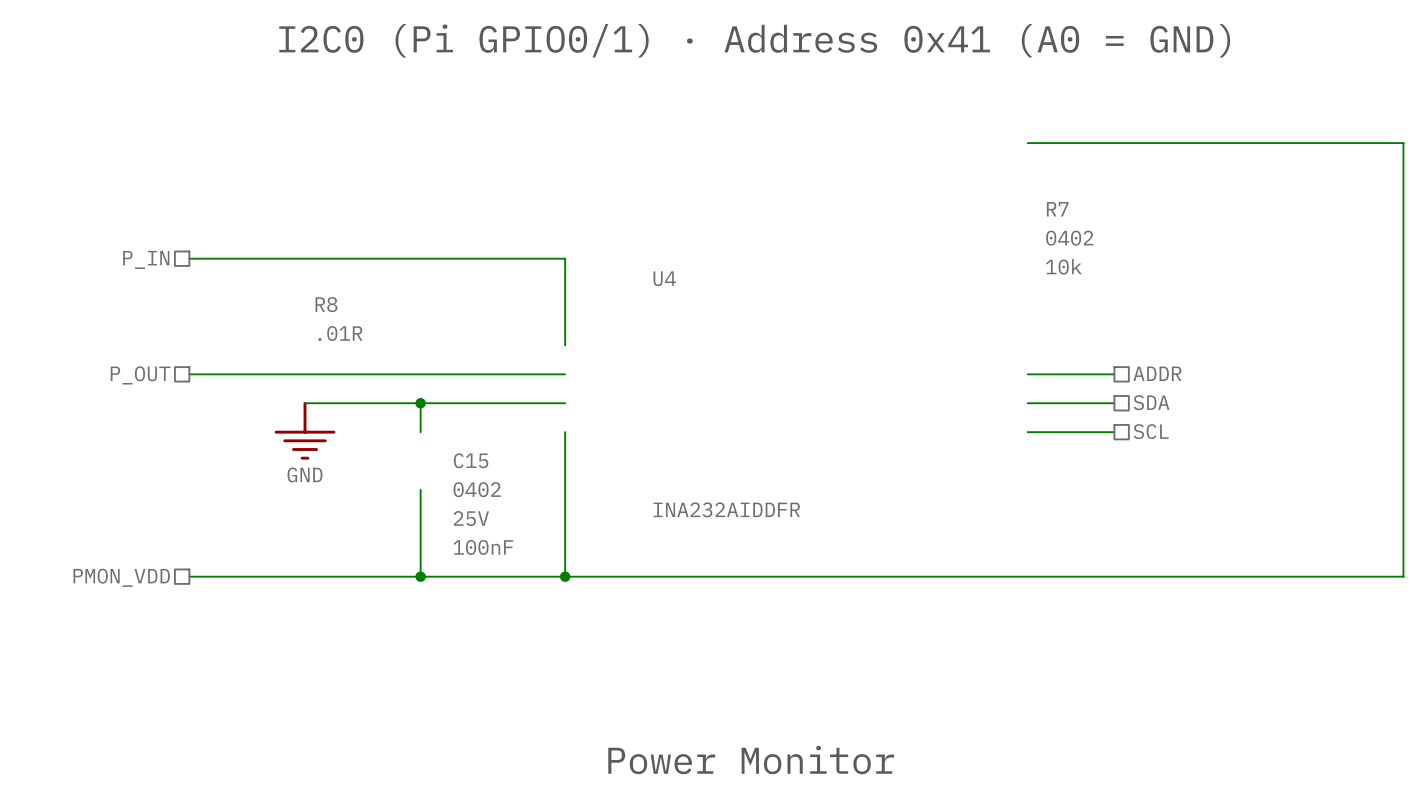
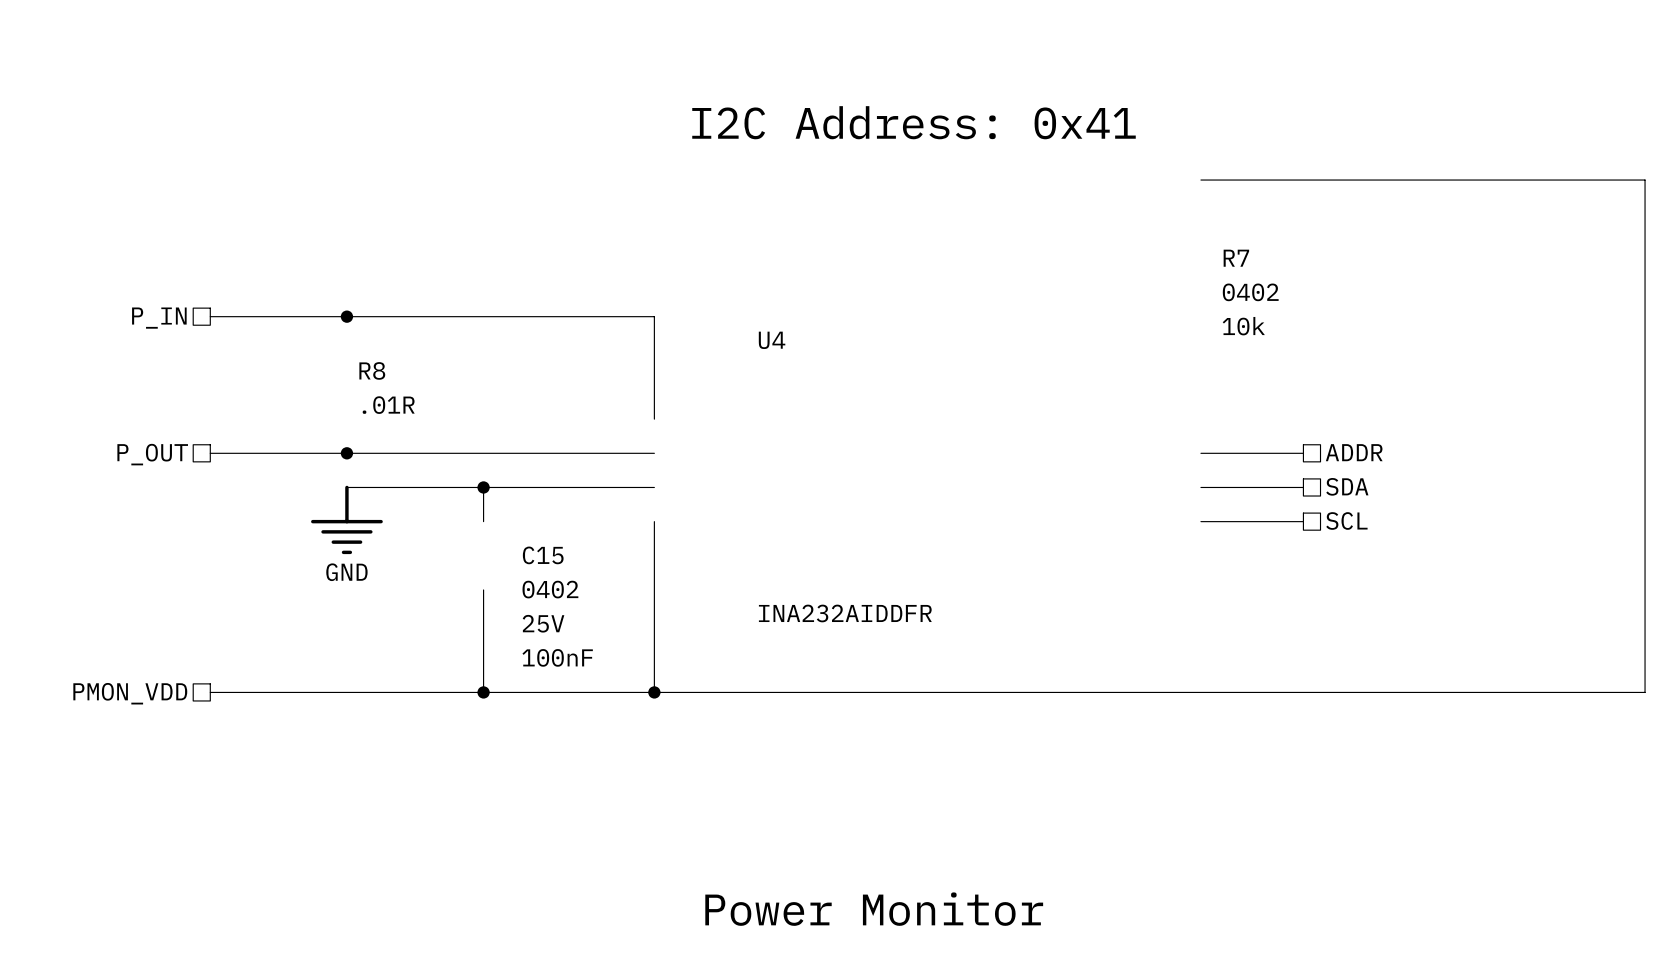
text: I2C0 (Pi GPIO0/1) · Address 0x41 (A0 = GND) (754, 40) -> none
text: none -> I2C Address: 0x41 (914, 122)
junction: none -> (346, 316)
junction: none -> (346, 453)

